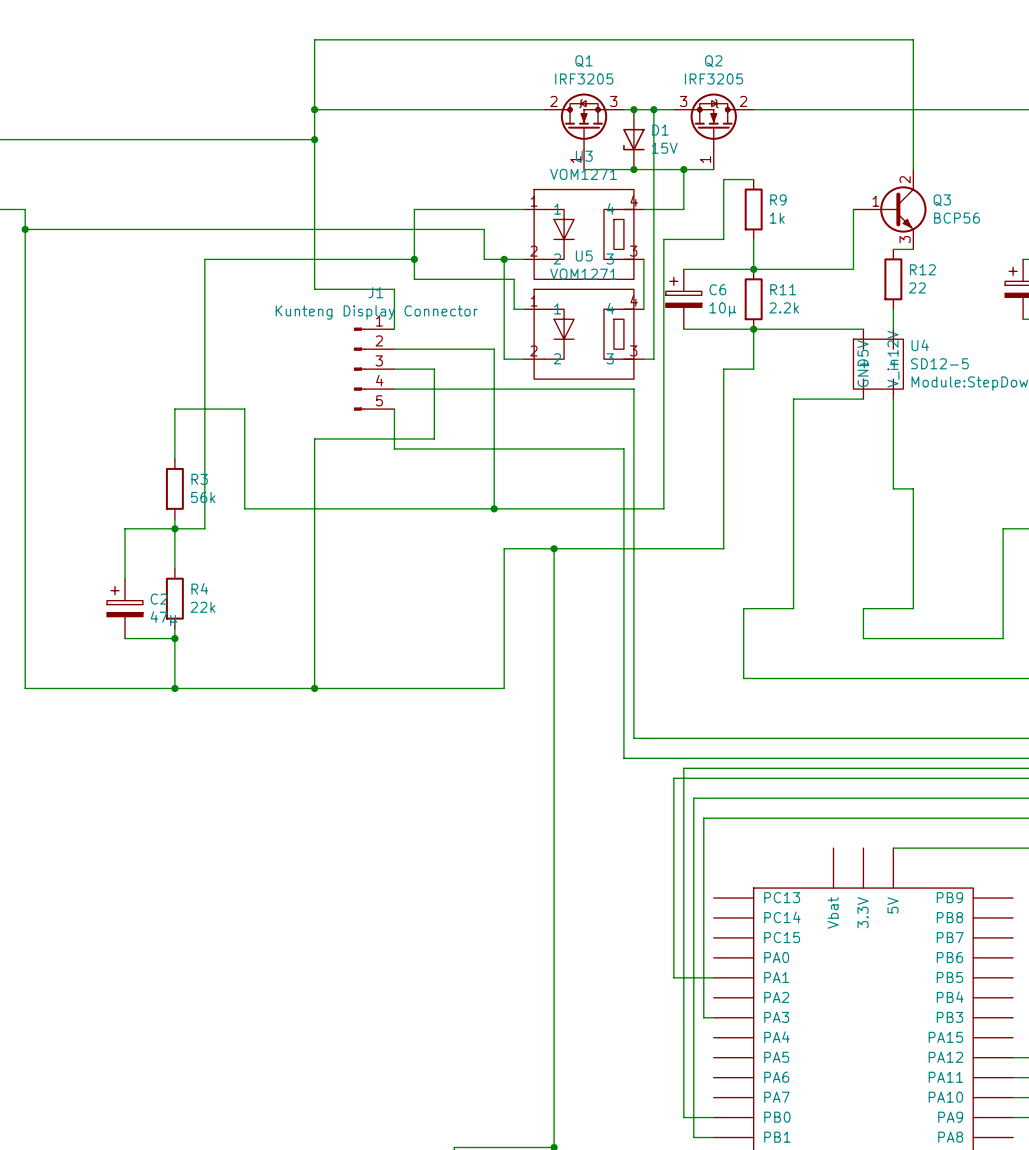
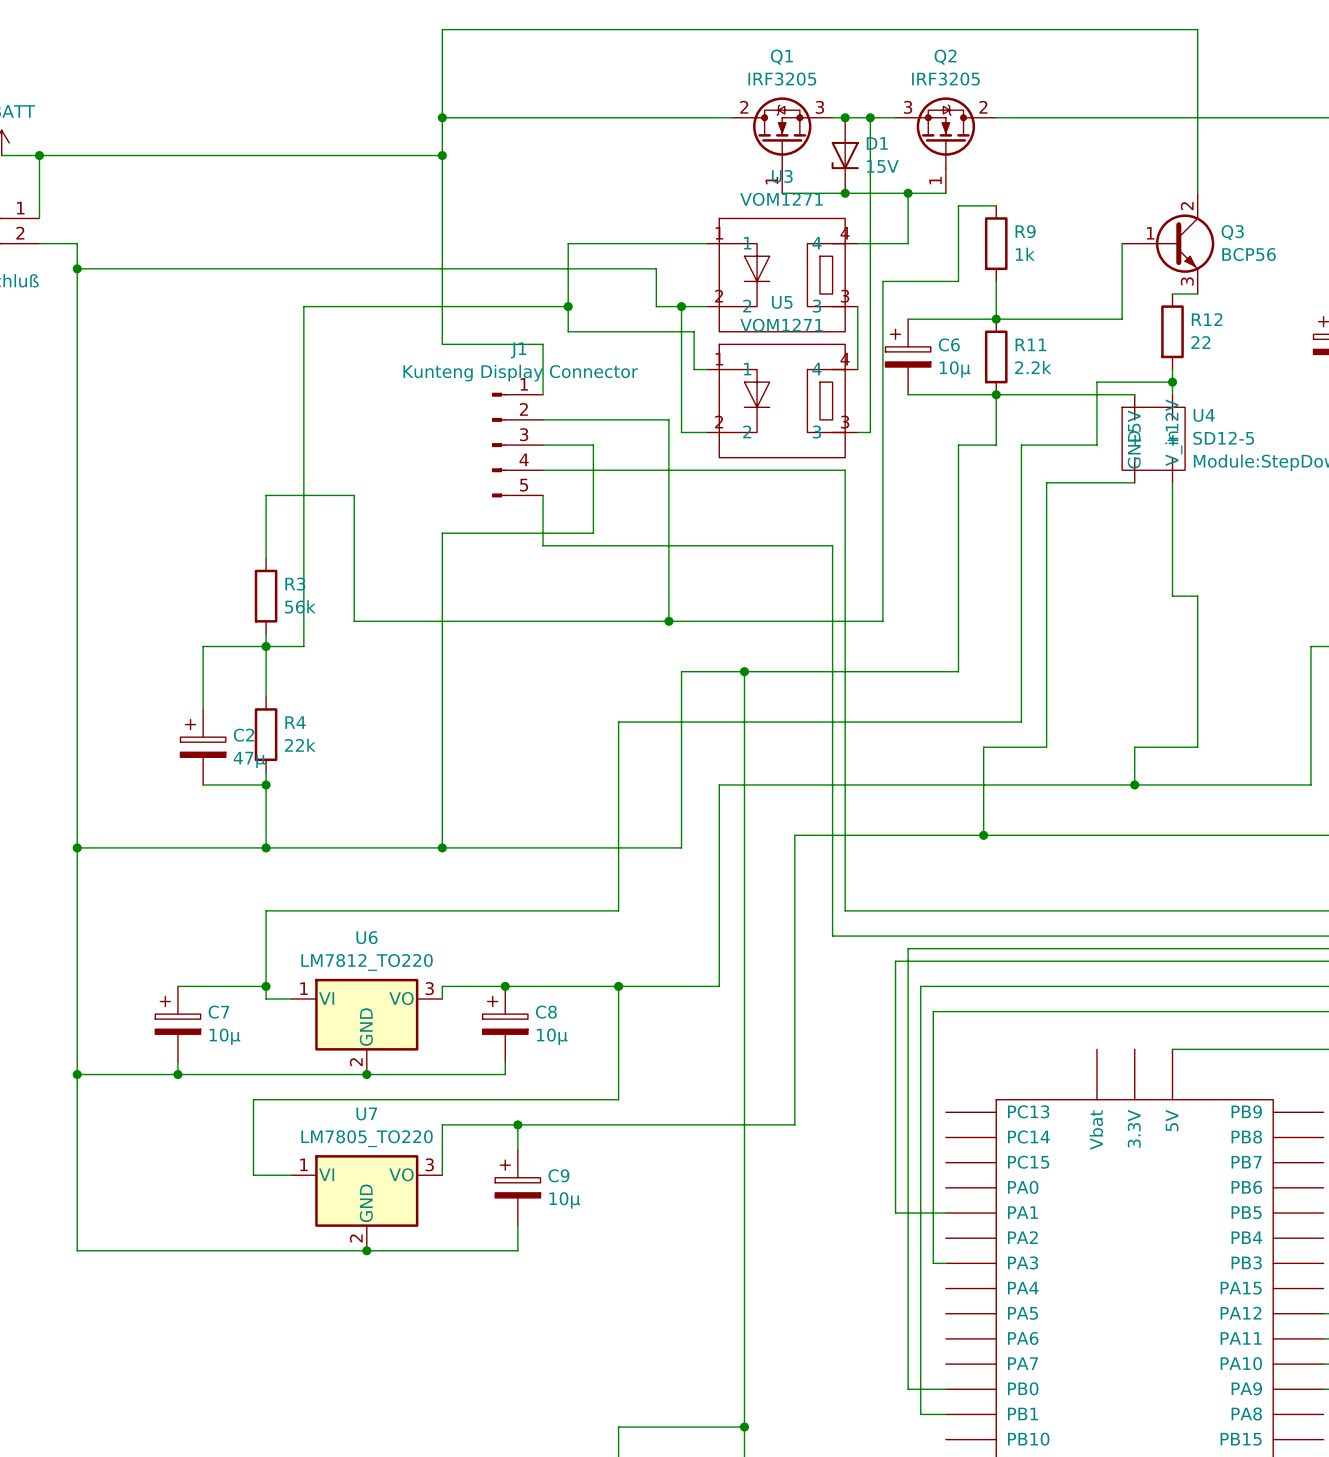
wire: none -> (1172, 382) (1096, 382) (1096, 445) (1021, 445) (1021, 722) (618, 722) (618, 910) (266, 910) (266, 999) (291, 999)
junction: none -> (1172, 382)
wire: none -> (1134, 784) (719, 784) (719, 986) (442, 986) (442, 999)
junction: none -> (1134, 784)
wire: none -> (983, 835) (794, 835) (794, 1124) (442, 1124) (442, 1175)
junction: none -> (983, 835)
wire: none -> (77, 847) (77, 1250) (517, 1250) (517, 1225)
junction: none -> (77, 847)
wire: none -> (177, 986) (266, 986)
junction: none -> (266, 986)
junction: none -> (505, 986)
wire: none -> (618, 986) (618, 1099) (253, 1099) (253, 1175) (291, 1175)
junction: none -> (618, 986)
C7: none -> 10µ (177, 1024)
C8: none -> 10µ (505, 1024)
U6: none -> LM7812_TO220 (366, 1026)
wire: none -> (177, 1061) (177, 1074)
wire: none -> (505, 1061) (505, 1074) (77, 1074)
junction: none -> (77, 1074)
junction: none -> (177, 1074)
junction: none -> (366, 1074)
wire: none -> (517, 1124) (517, 1150)
junction: none -> (517, 1124)
C9: none -> 10µ (517, 1187)
U7: none -> LM7805_TO220 (366, 1202)
junction: none -> (366, 1250)

